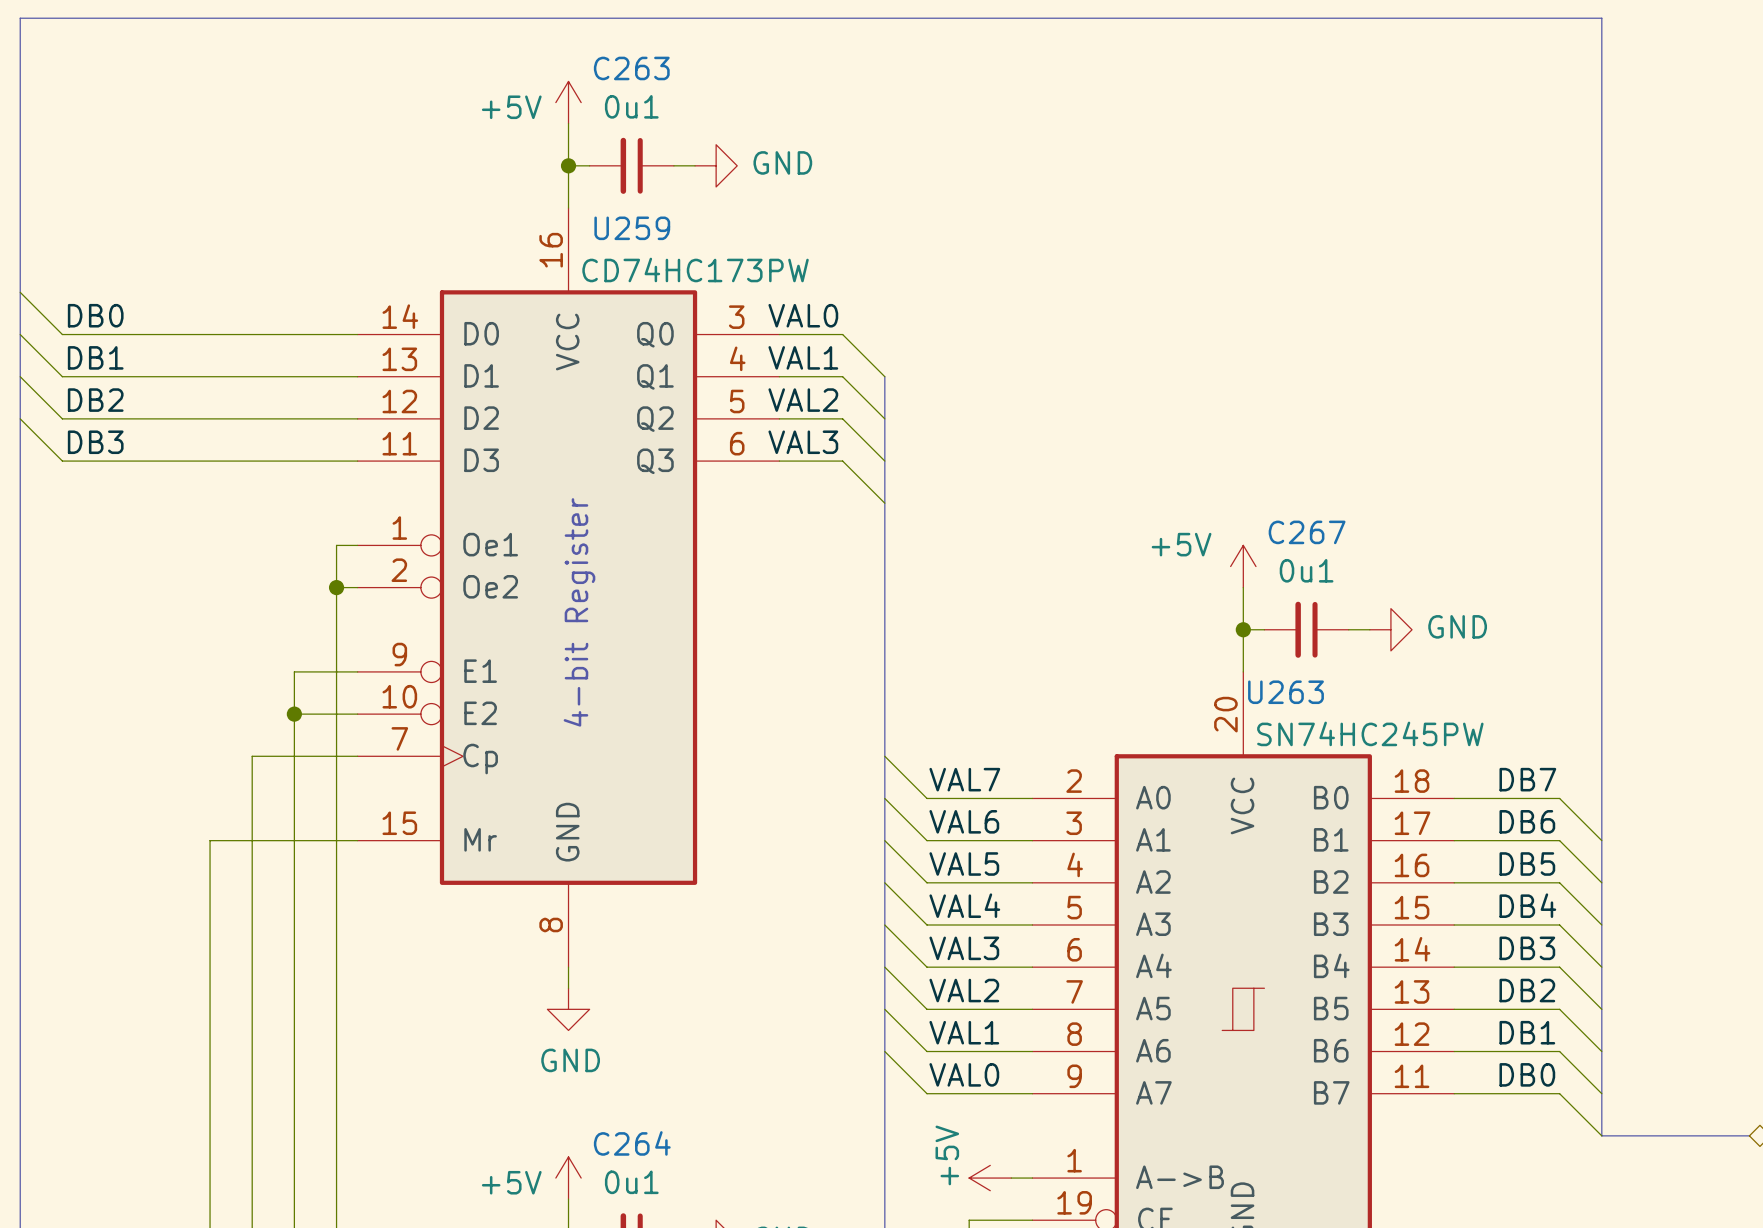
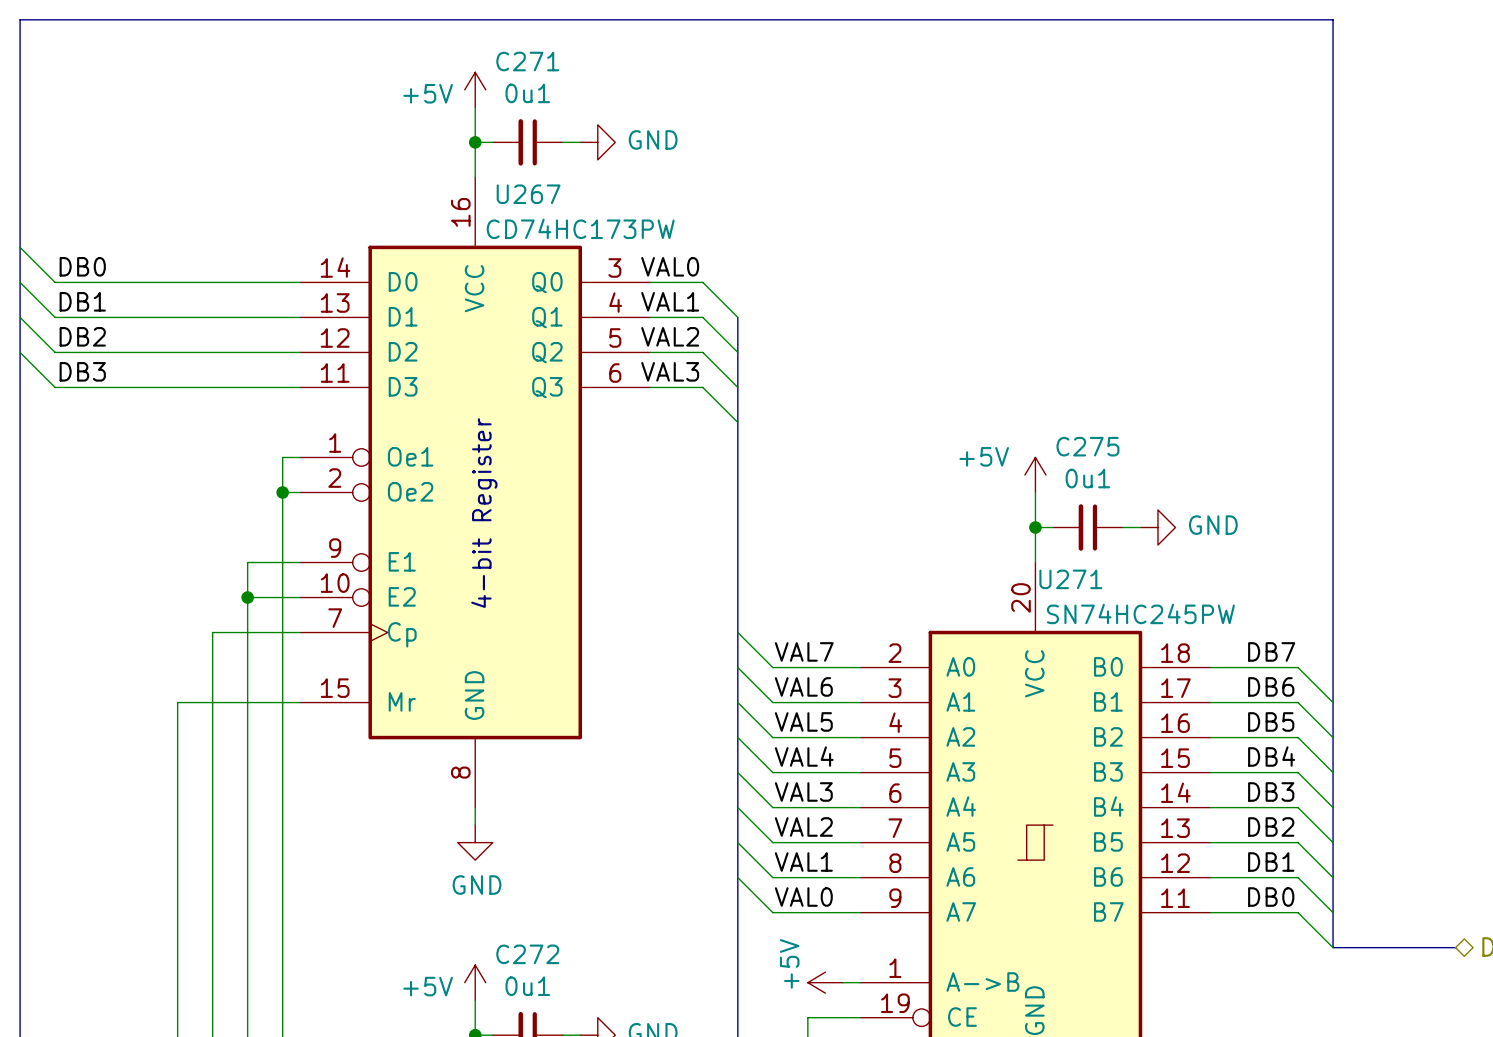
C263 name: C263 (631, 68) -> C271 (527, 61)
U259 name: U259 (632, 228) -> U267 (528, 194)
C267 name: C267 (1307, 532) -> C275 (1087, 446)
U263 name: U263 (1286, 692) -> U271 (1070, 579)
C264 name: C264 (632, 1143) -> C272 (527, 954)

